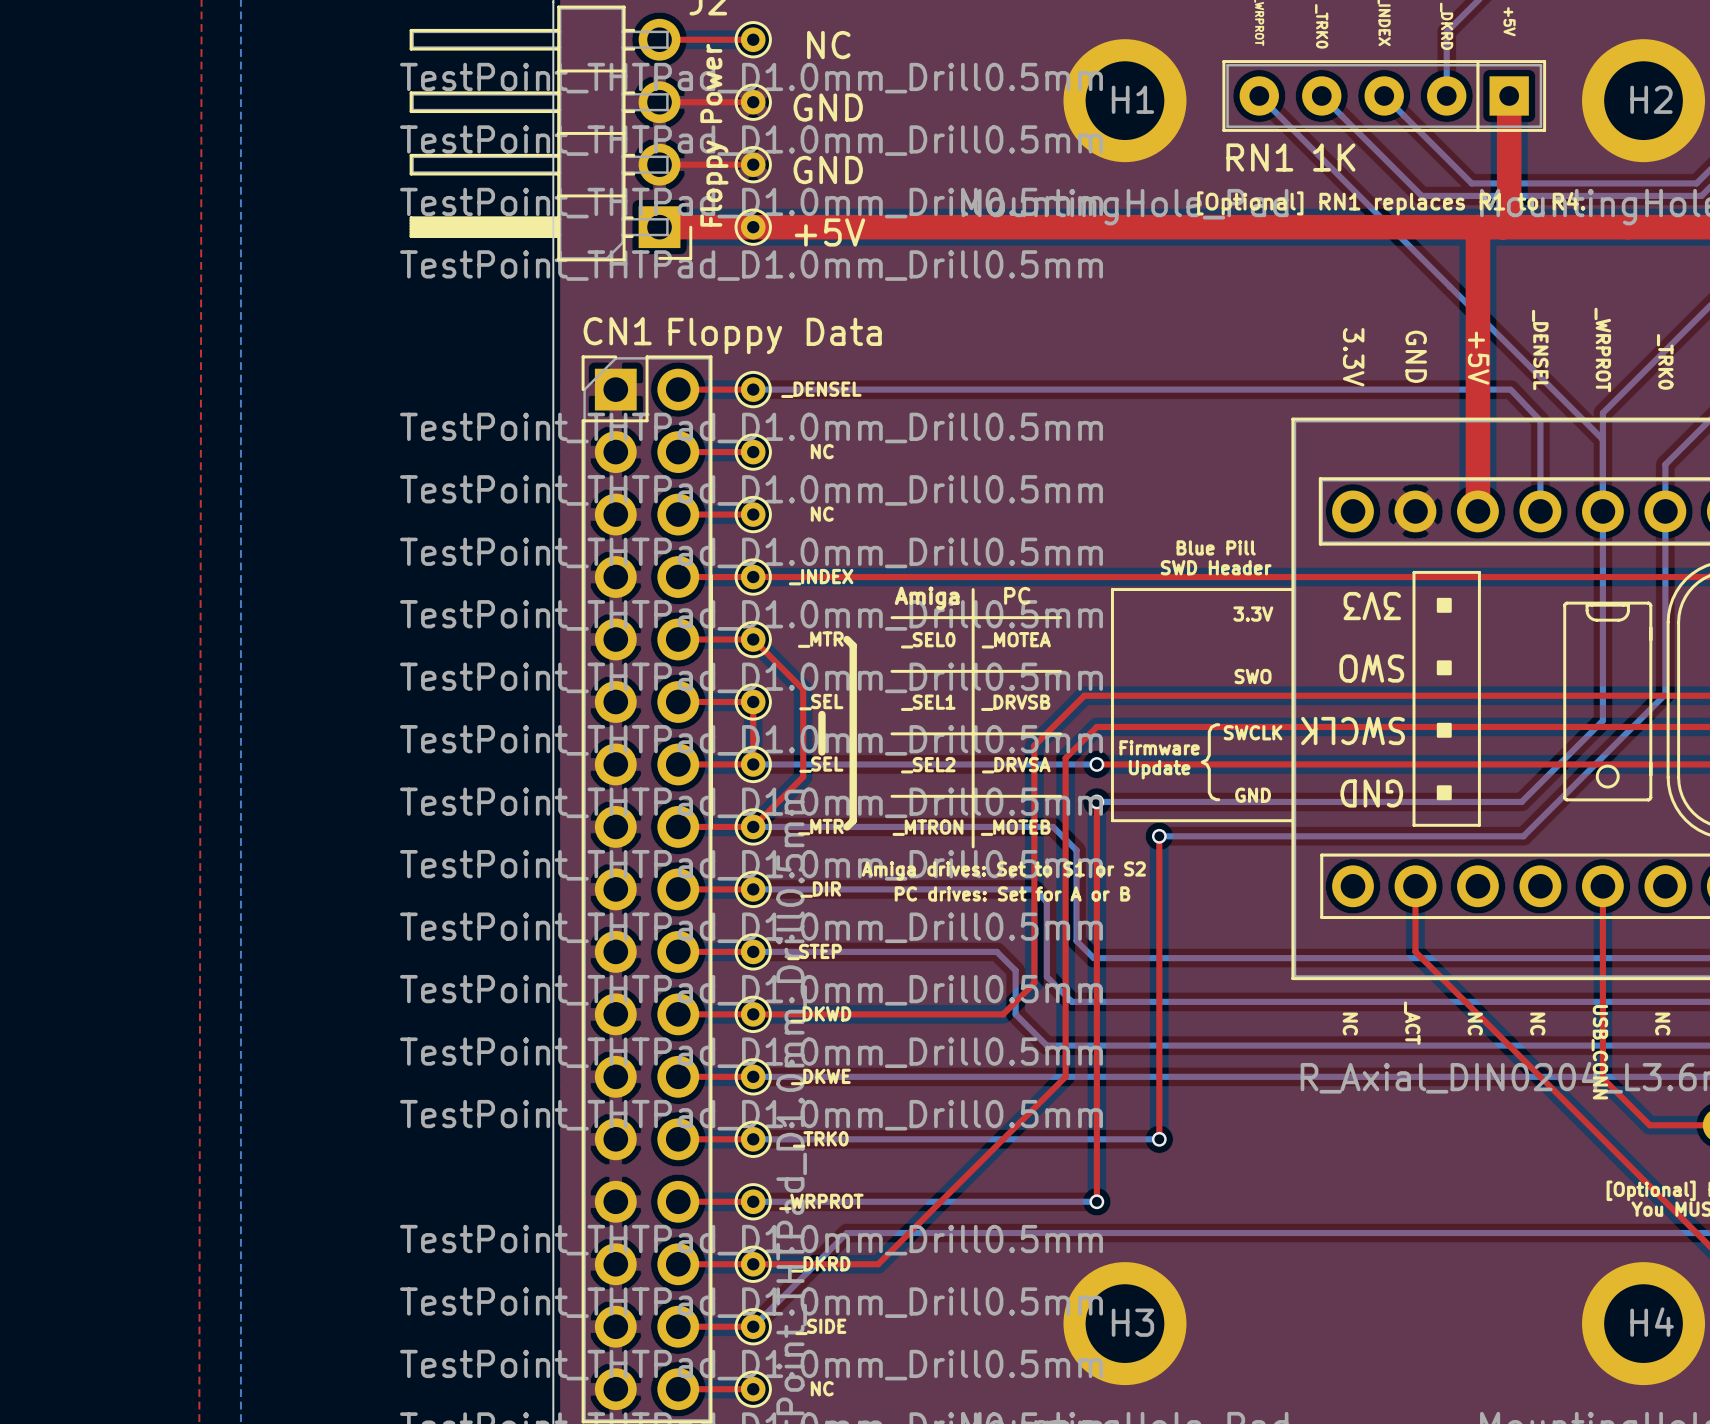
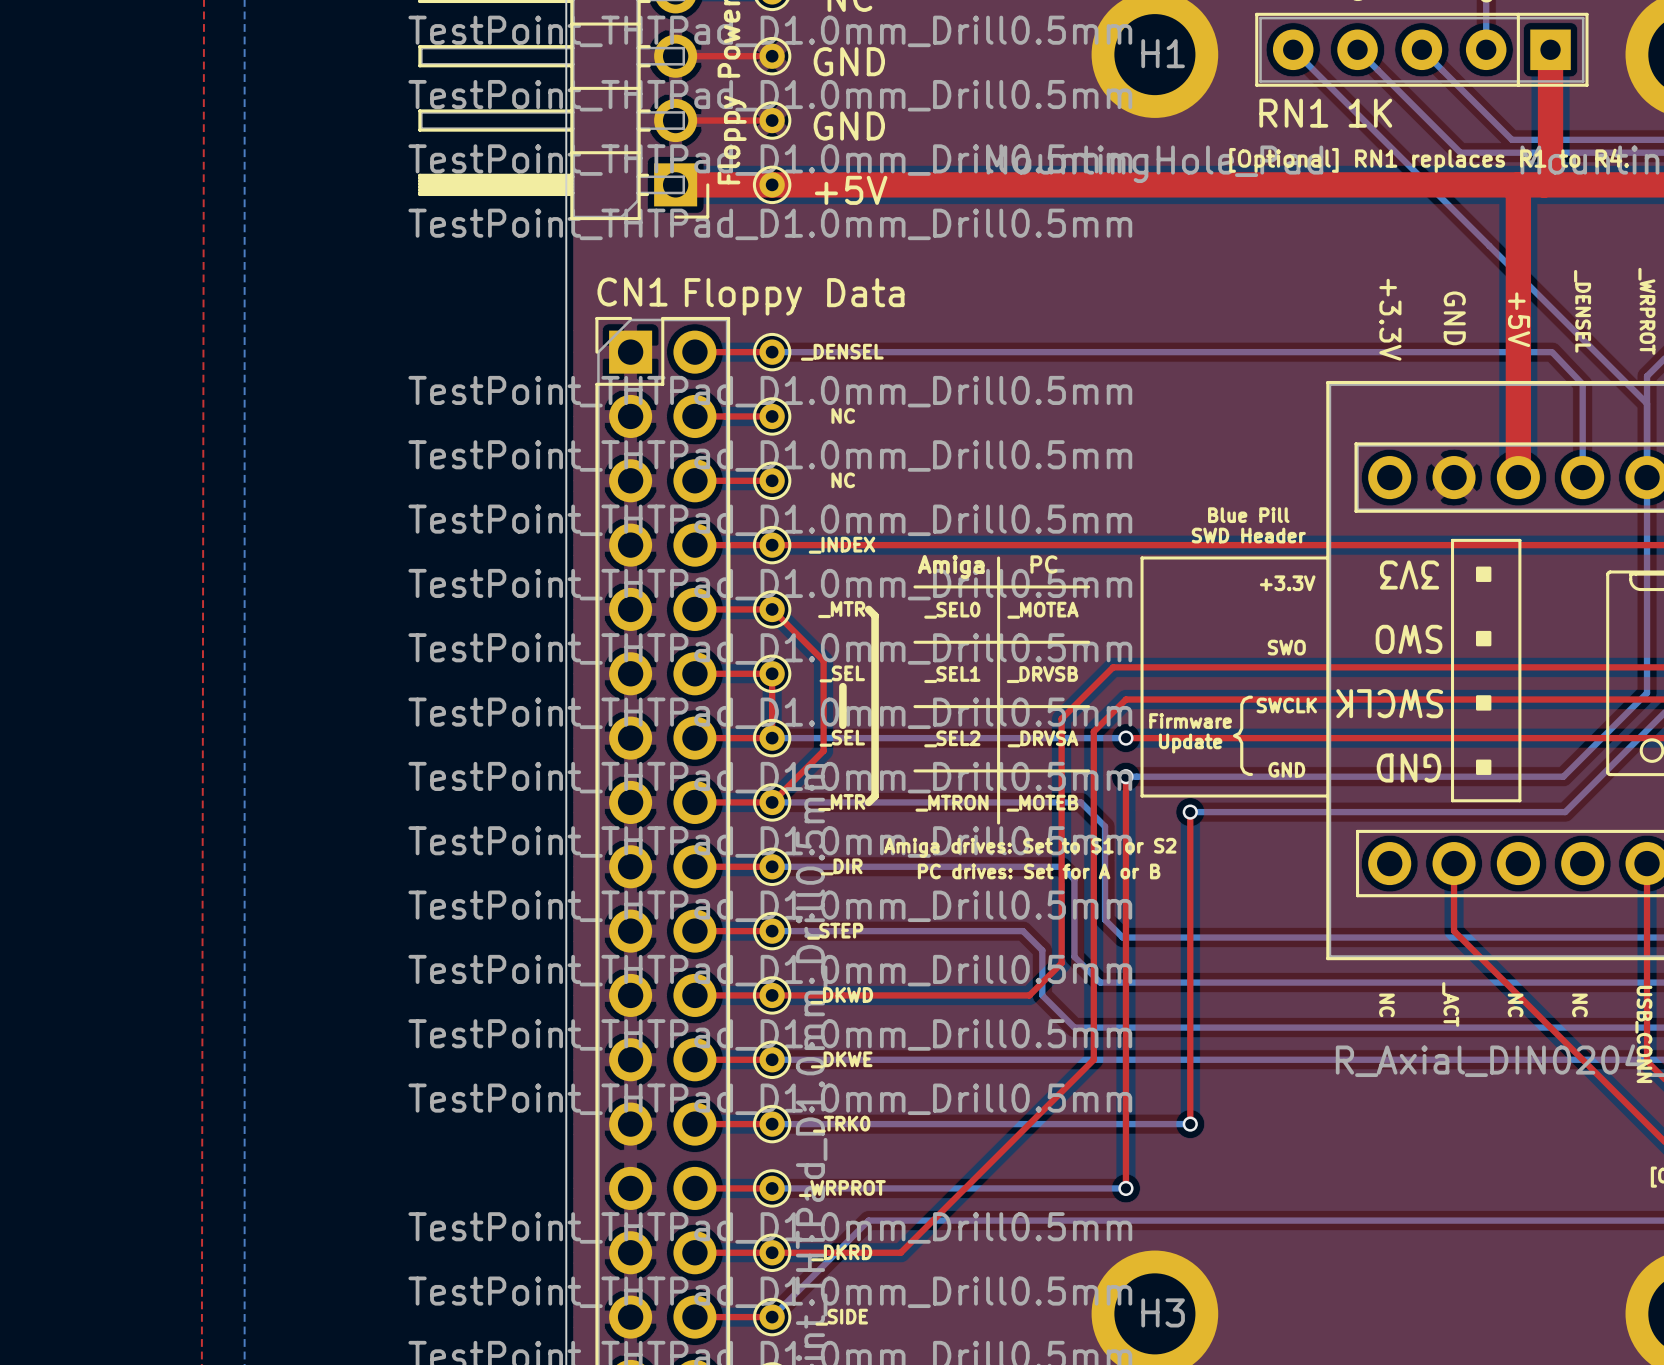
text: 3.3V (1353, 357) -> +3.3V (1390, 319)
text: 3.3V (1253, 614) -> +3.3V (1287, 583)

